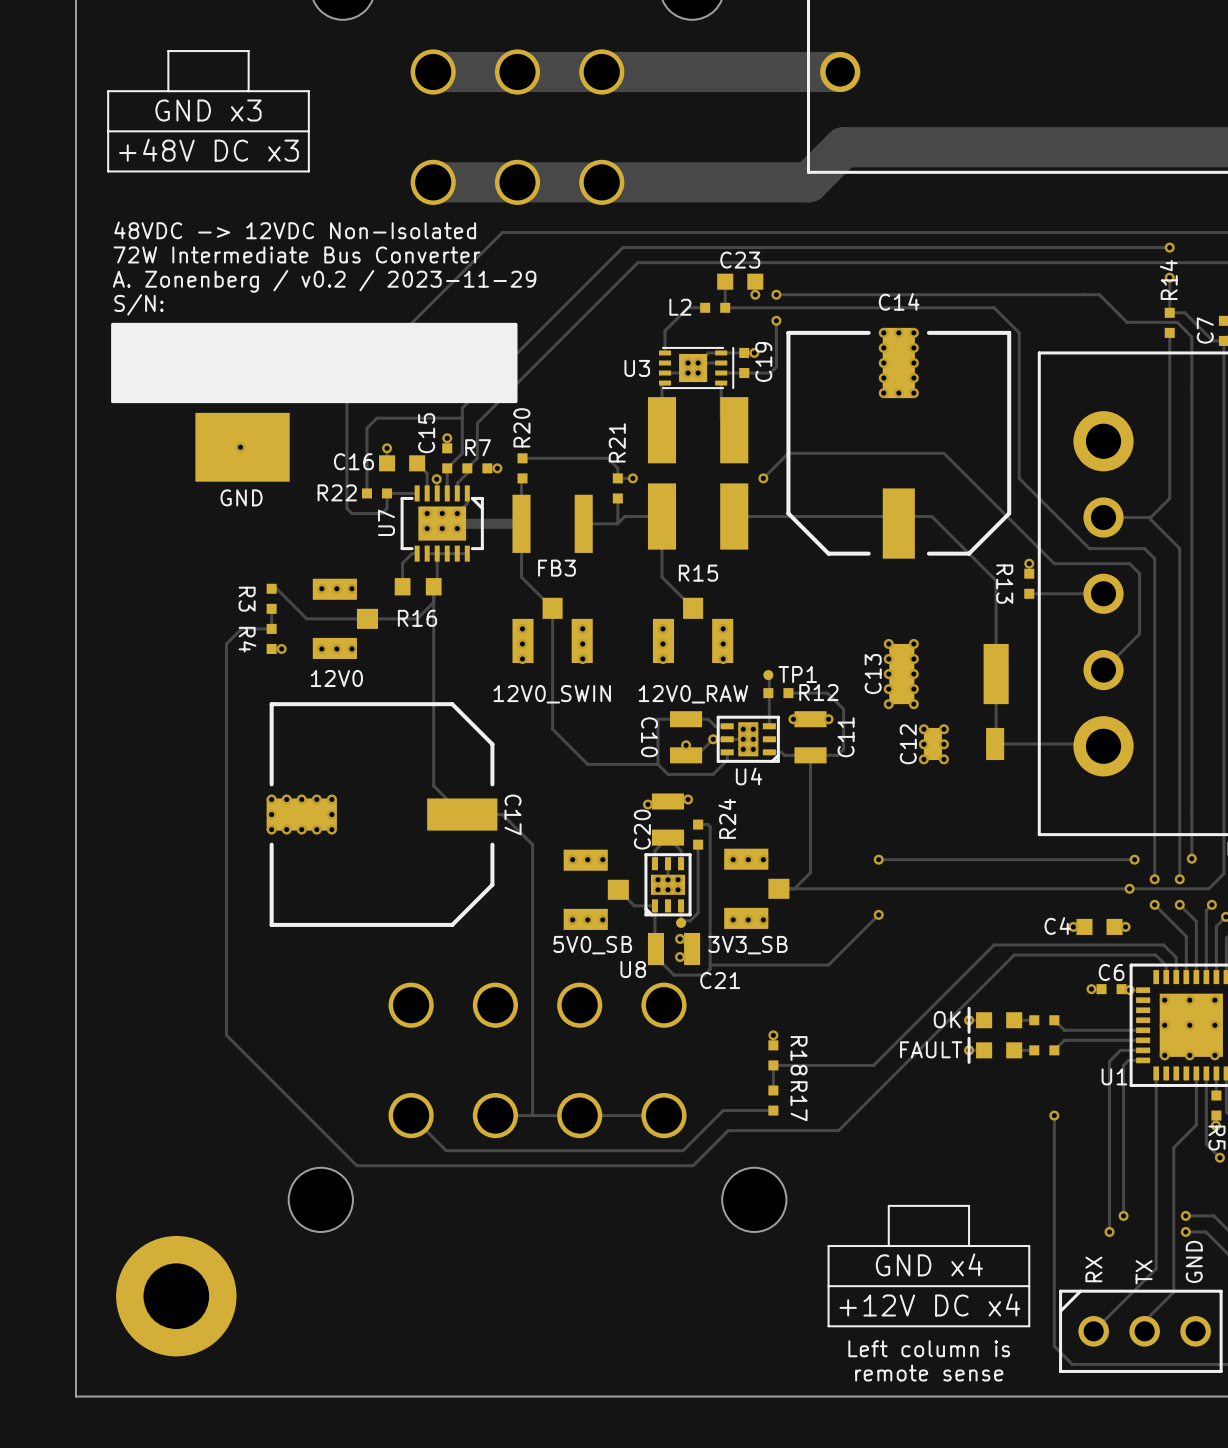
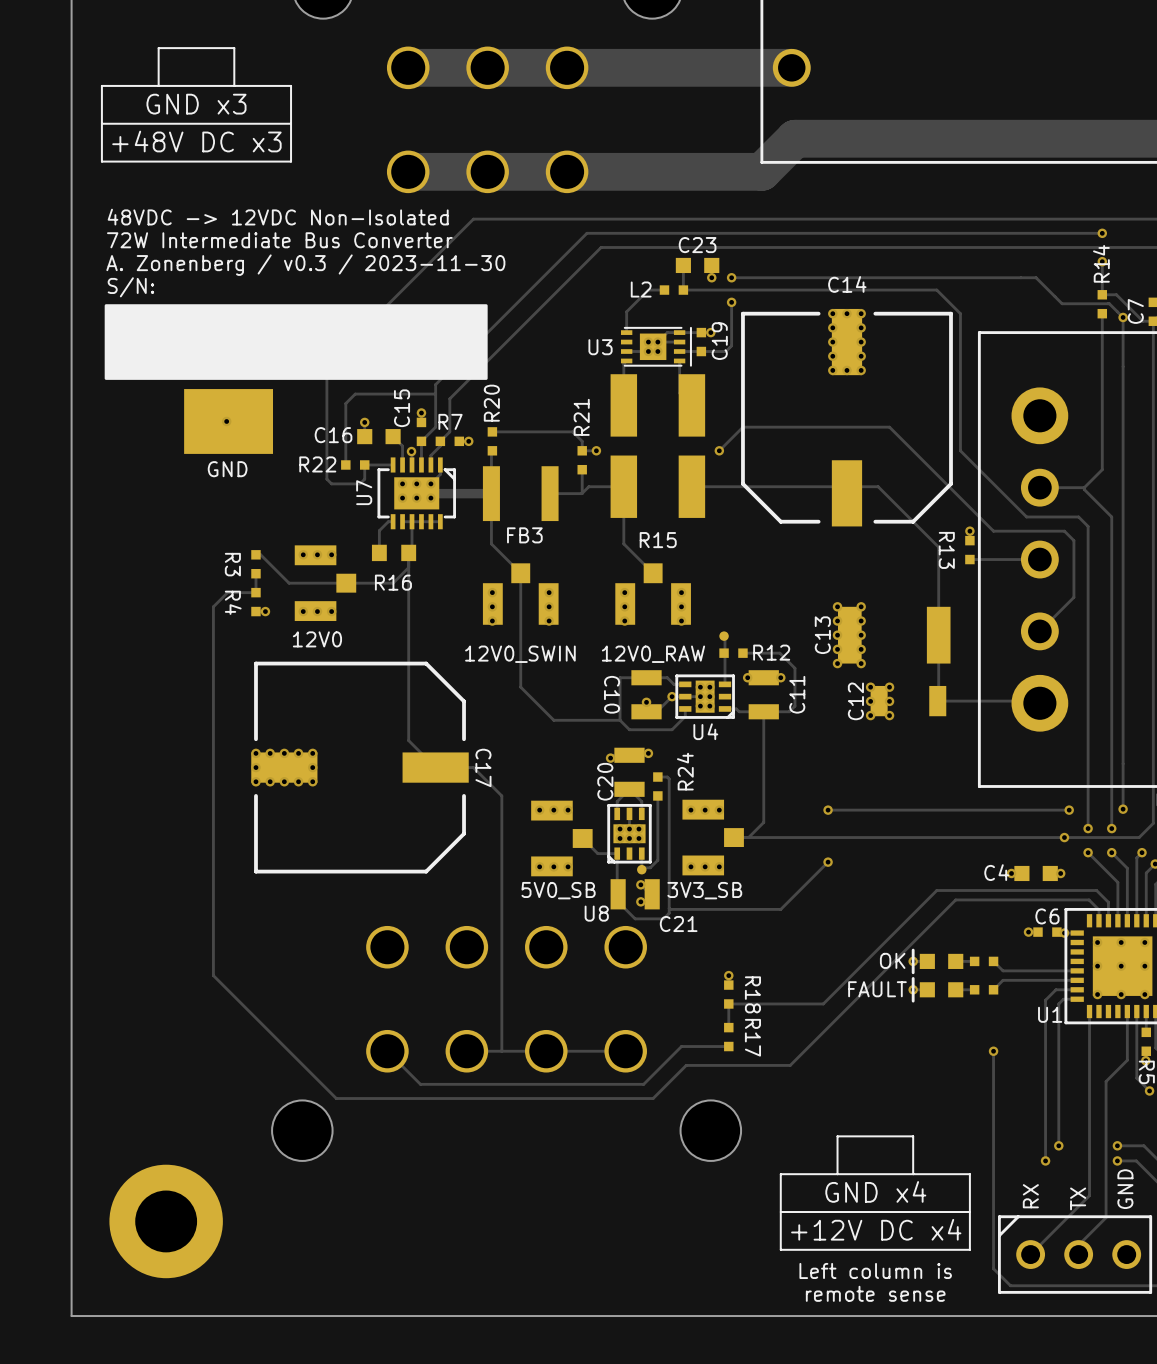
text: A. Zonenberg / v0.2 / 2023-11-29 (324, 281) -> A. Zonenberg / v0.3 / 2023-11-30 (305, 265)
via: none -> (1123, 317)
TP1 name: TP1 (797, 674) -> none

